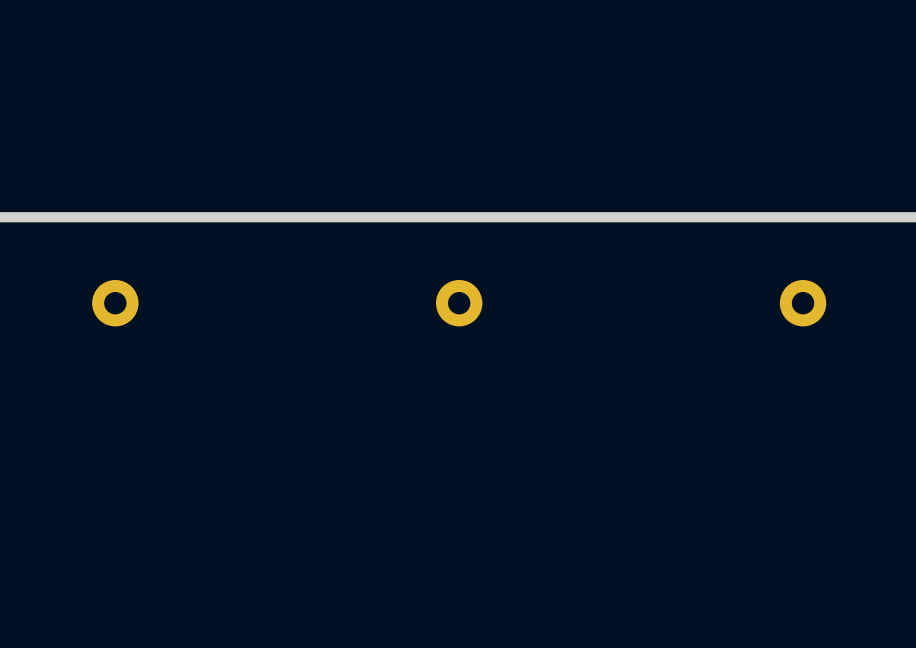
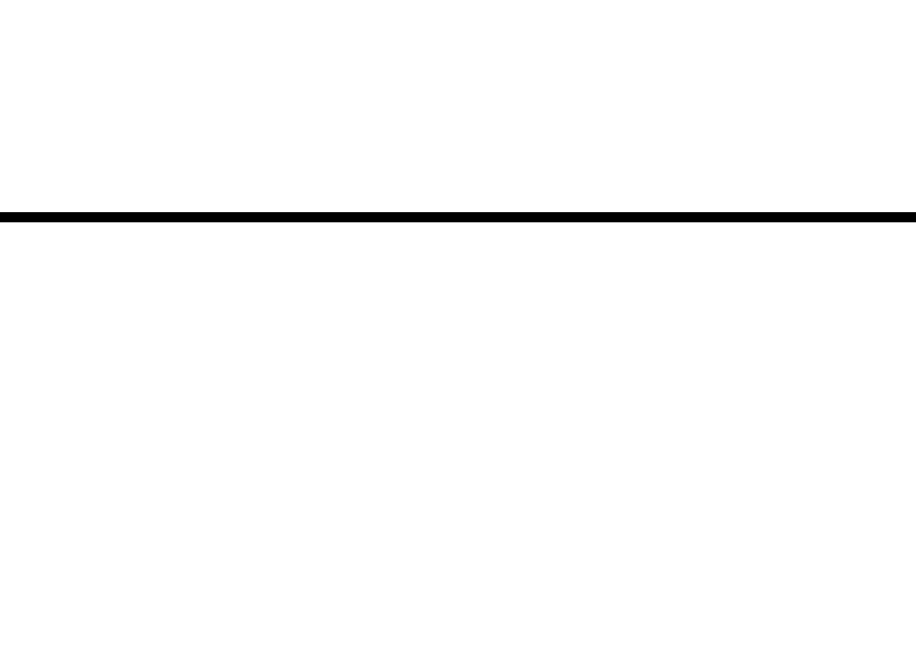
part: (115, 303) -> none
part: (459, 303) -> none
part: (803, 303) -> none

